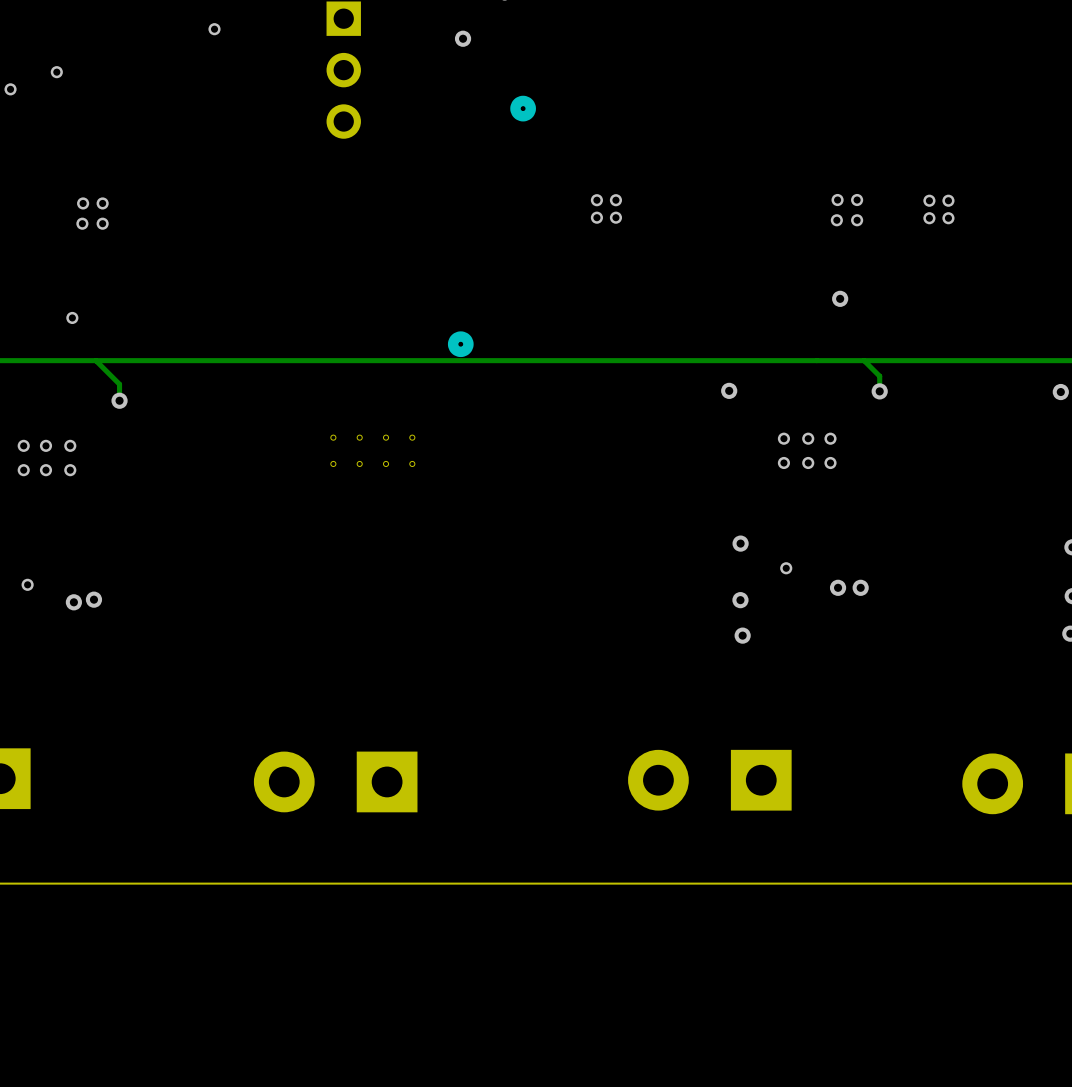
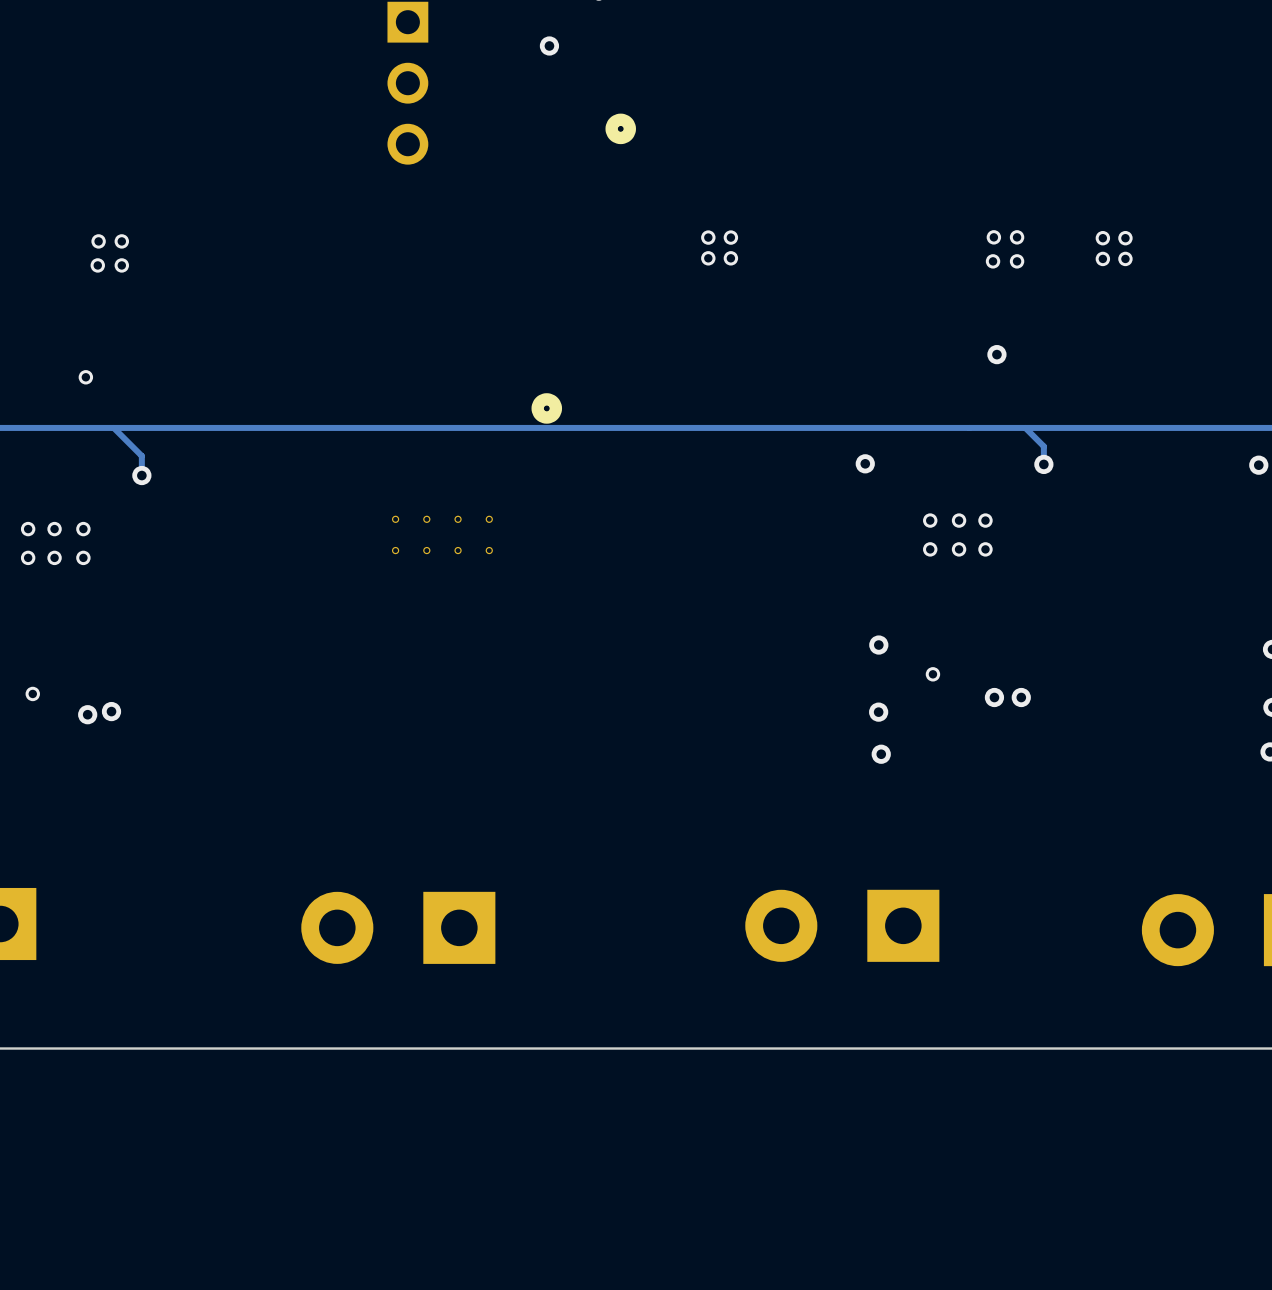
via: (214, 29) -> none
via: (56, 72) -> none
via: (10, 89) -> none

